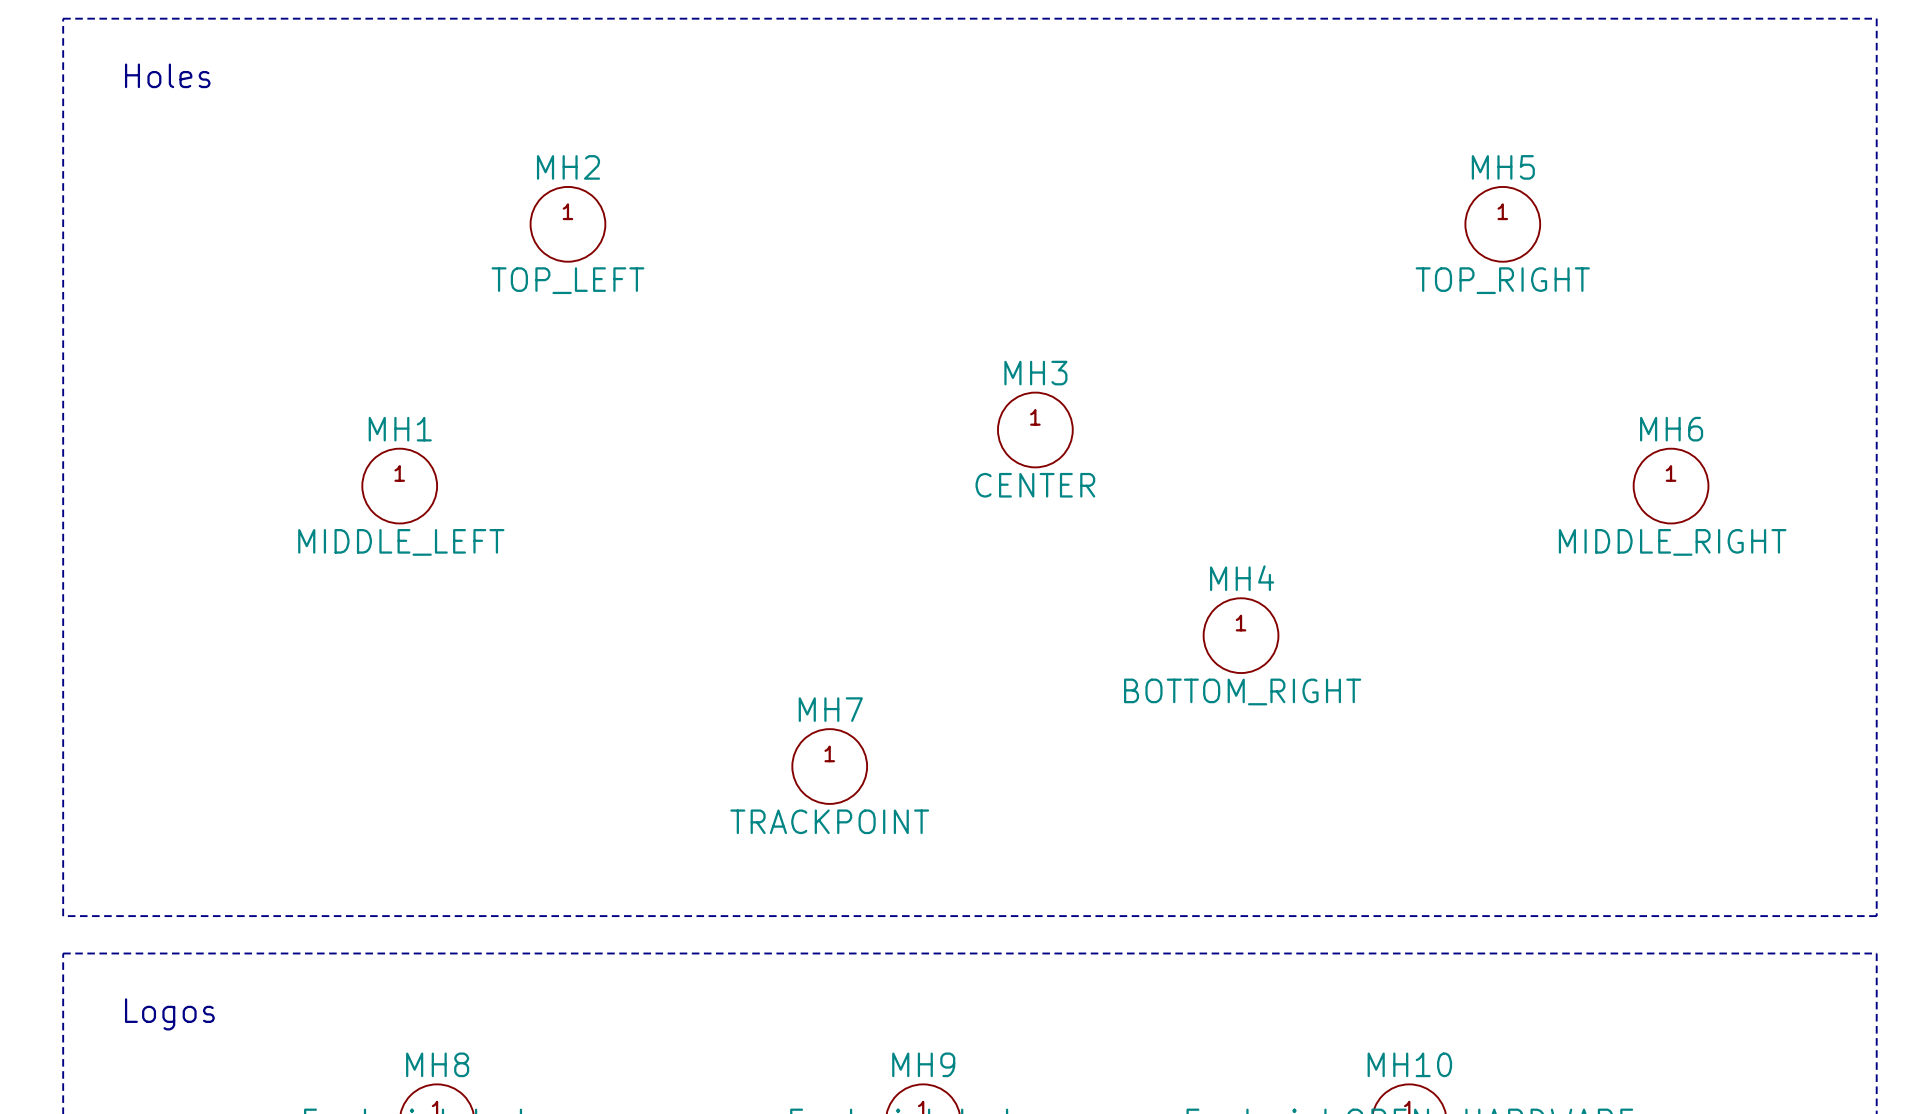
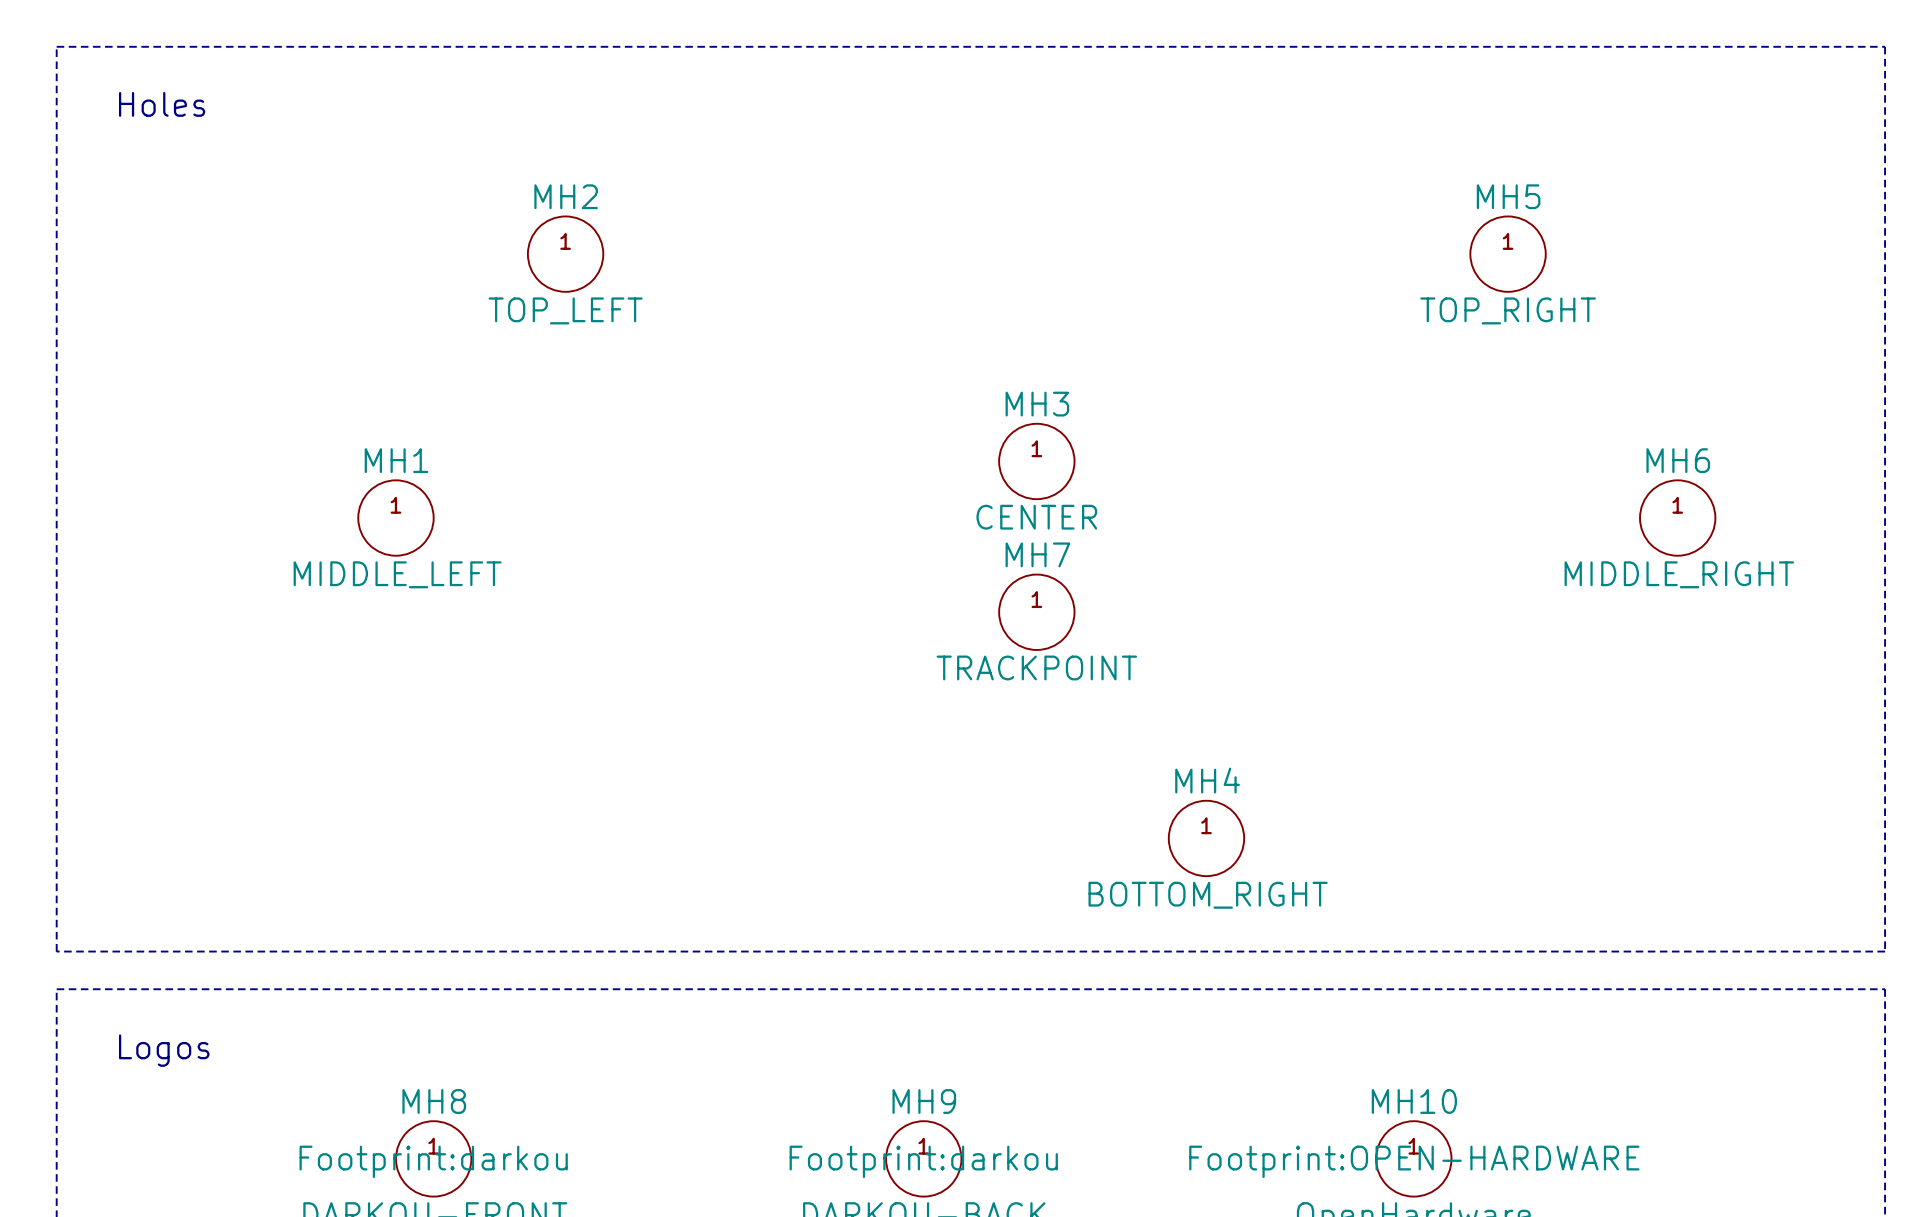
MH4 position: (1241, 635) -> (1206, 838)
MH7 position: (829, 766) -> (1036, 612)

